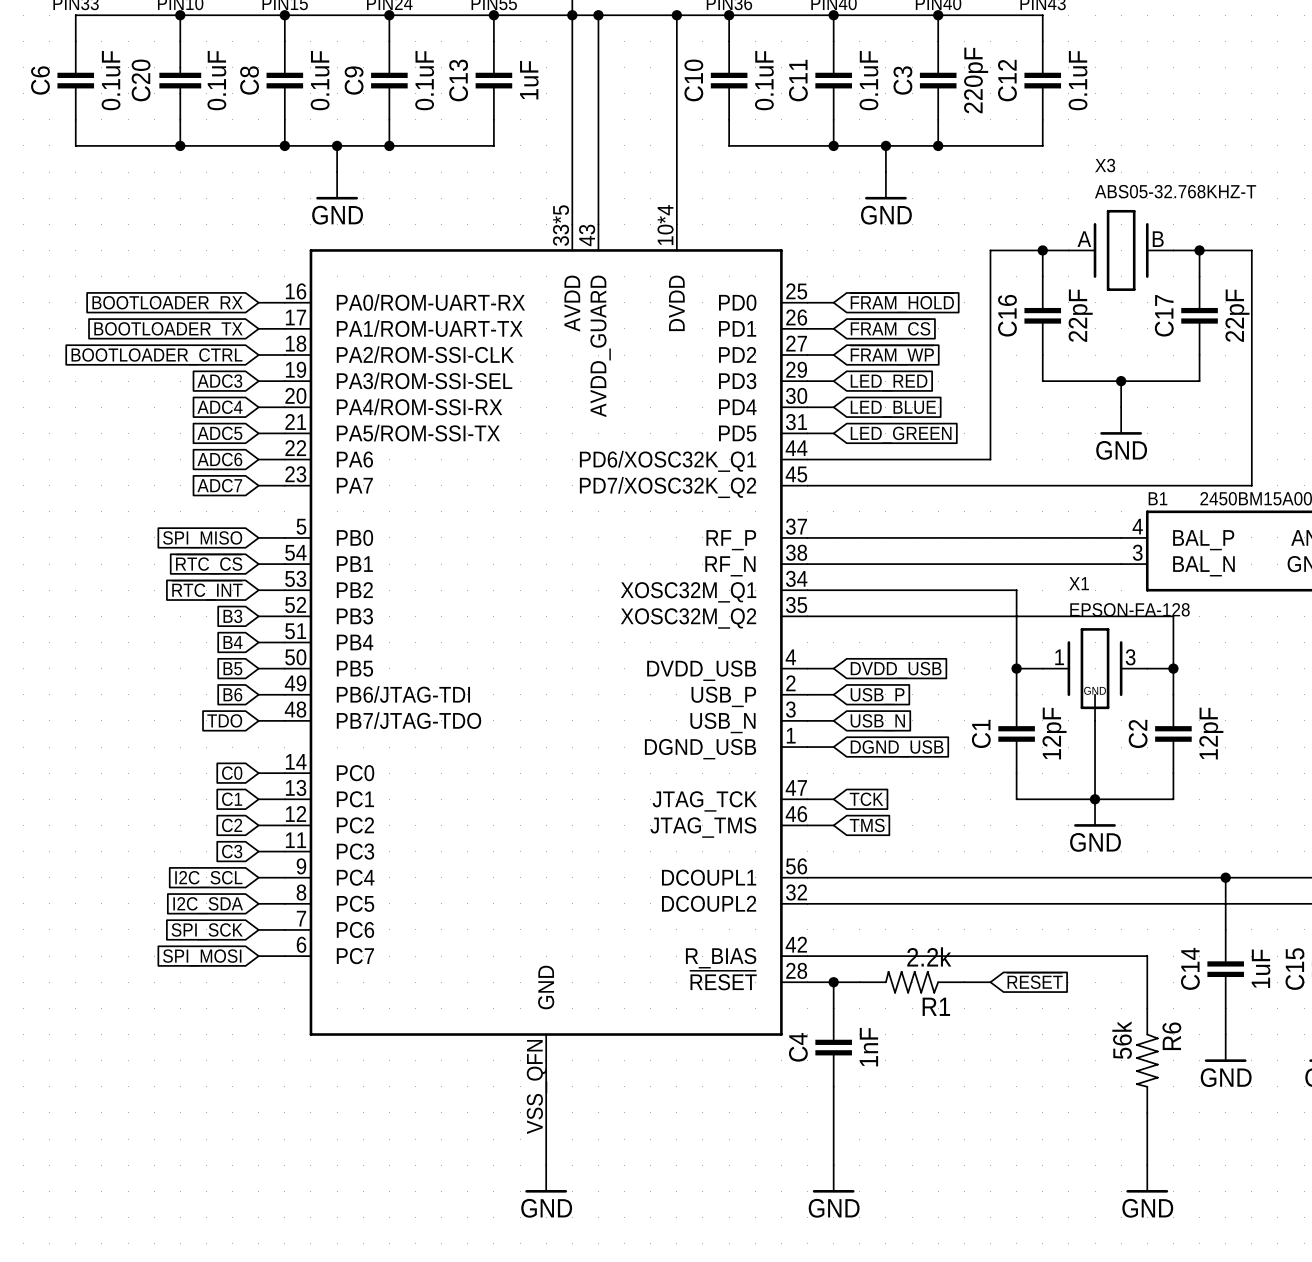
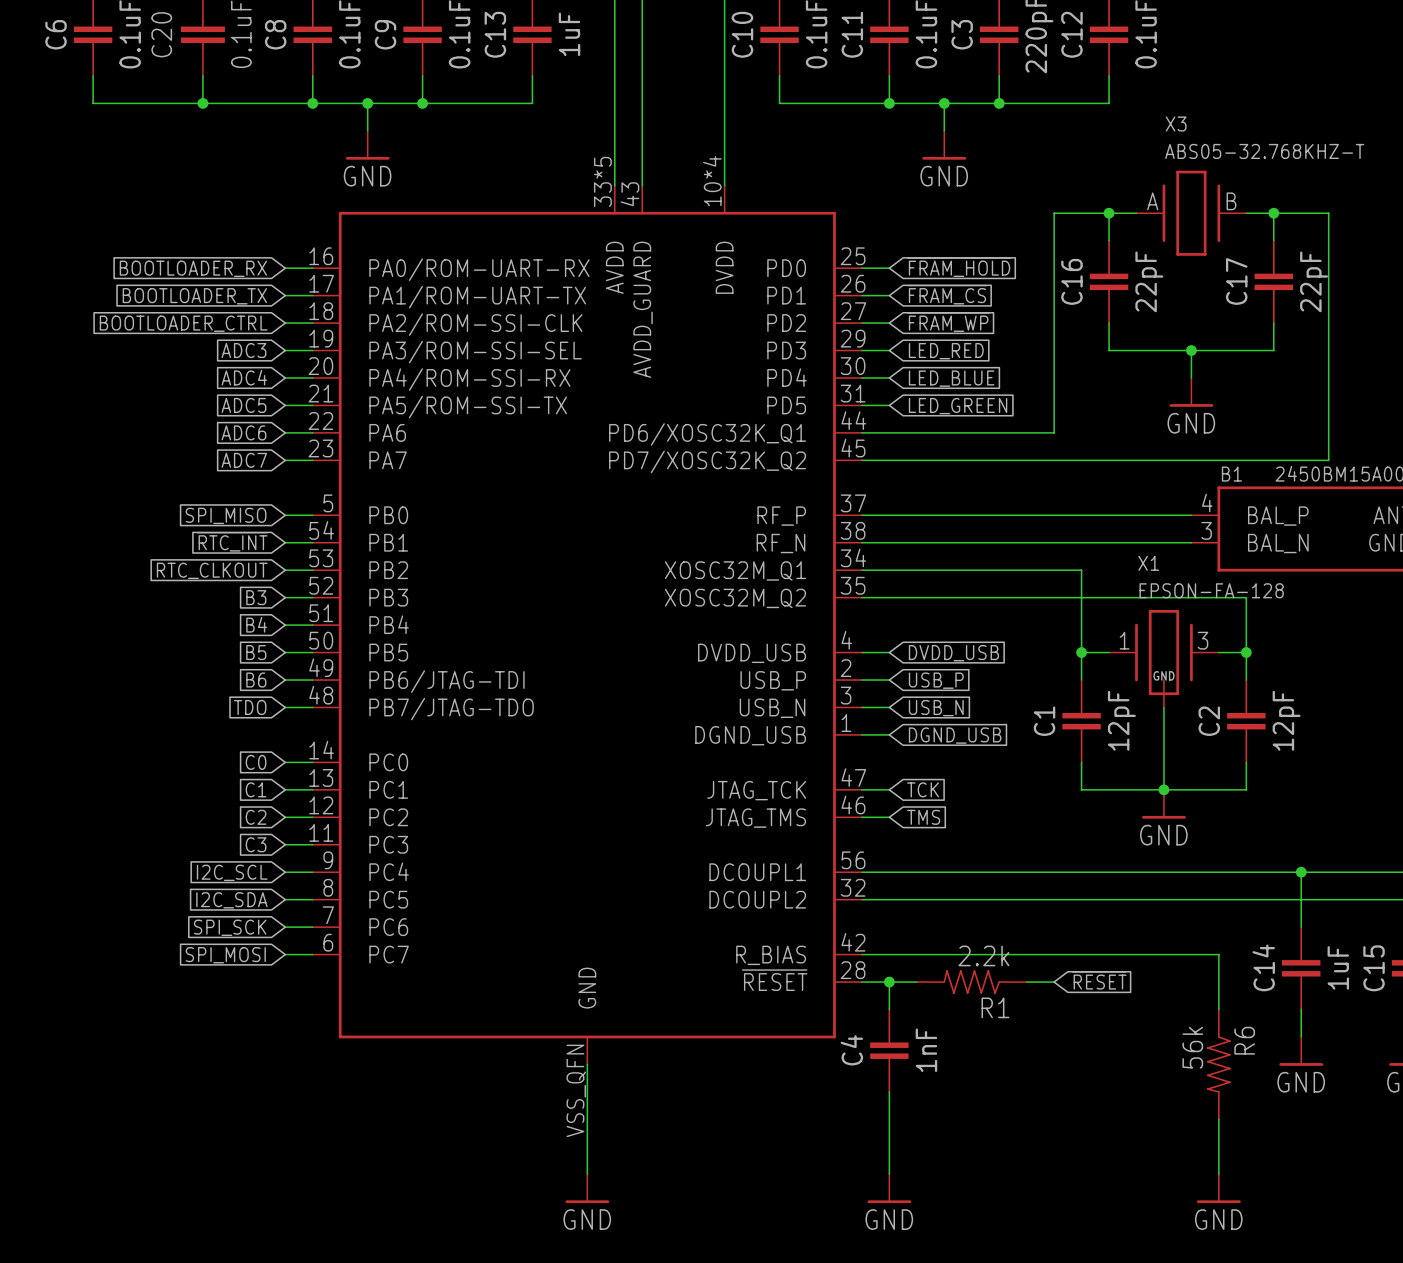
global label: ~{RTC_CS} (209, 564) -> ~{RTC_INT} (232, 541)
global label: ~{RTC_INT} (207, 590) -> RTC_CLKOUT (212, 570)

